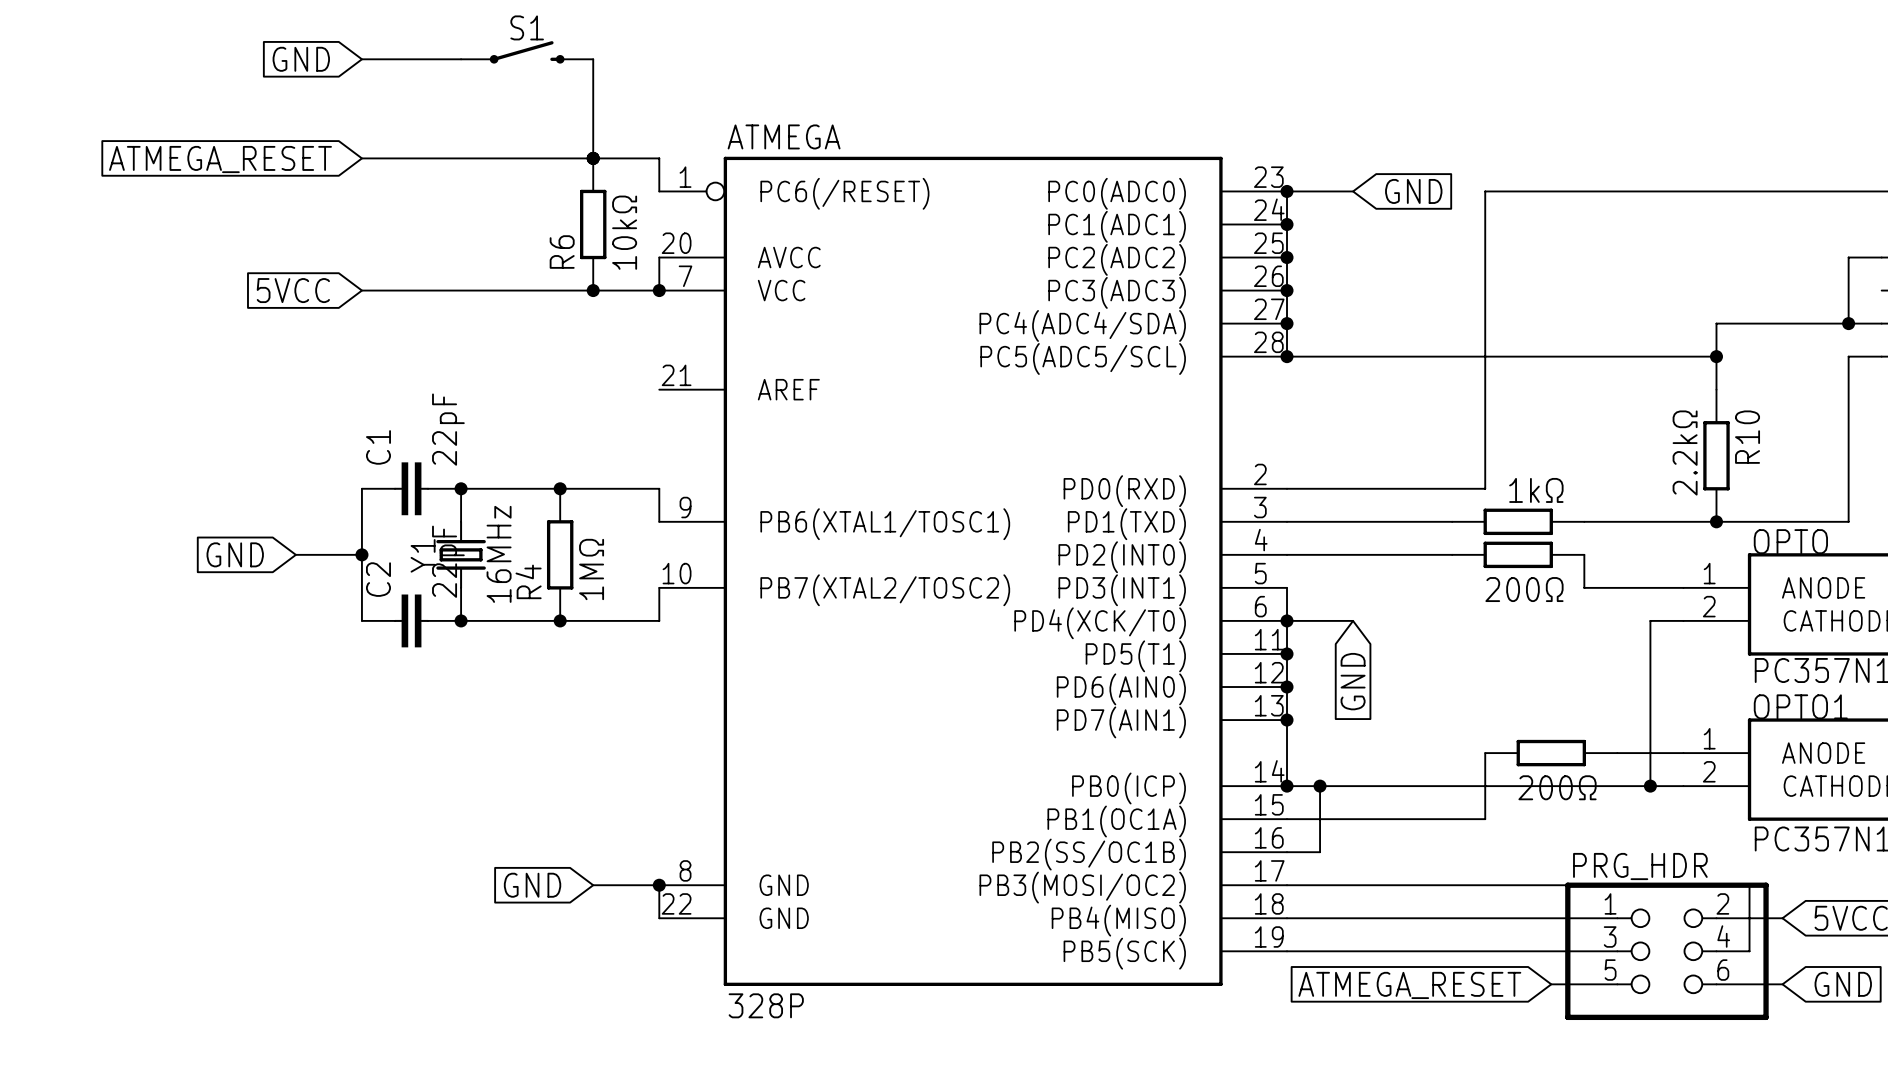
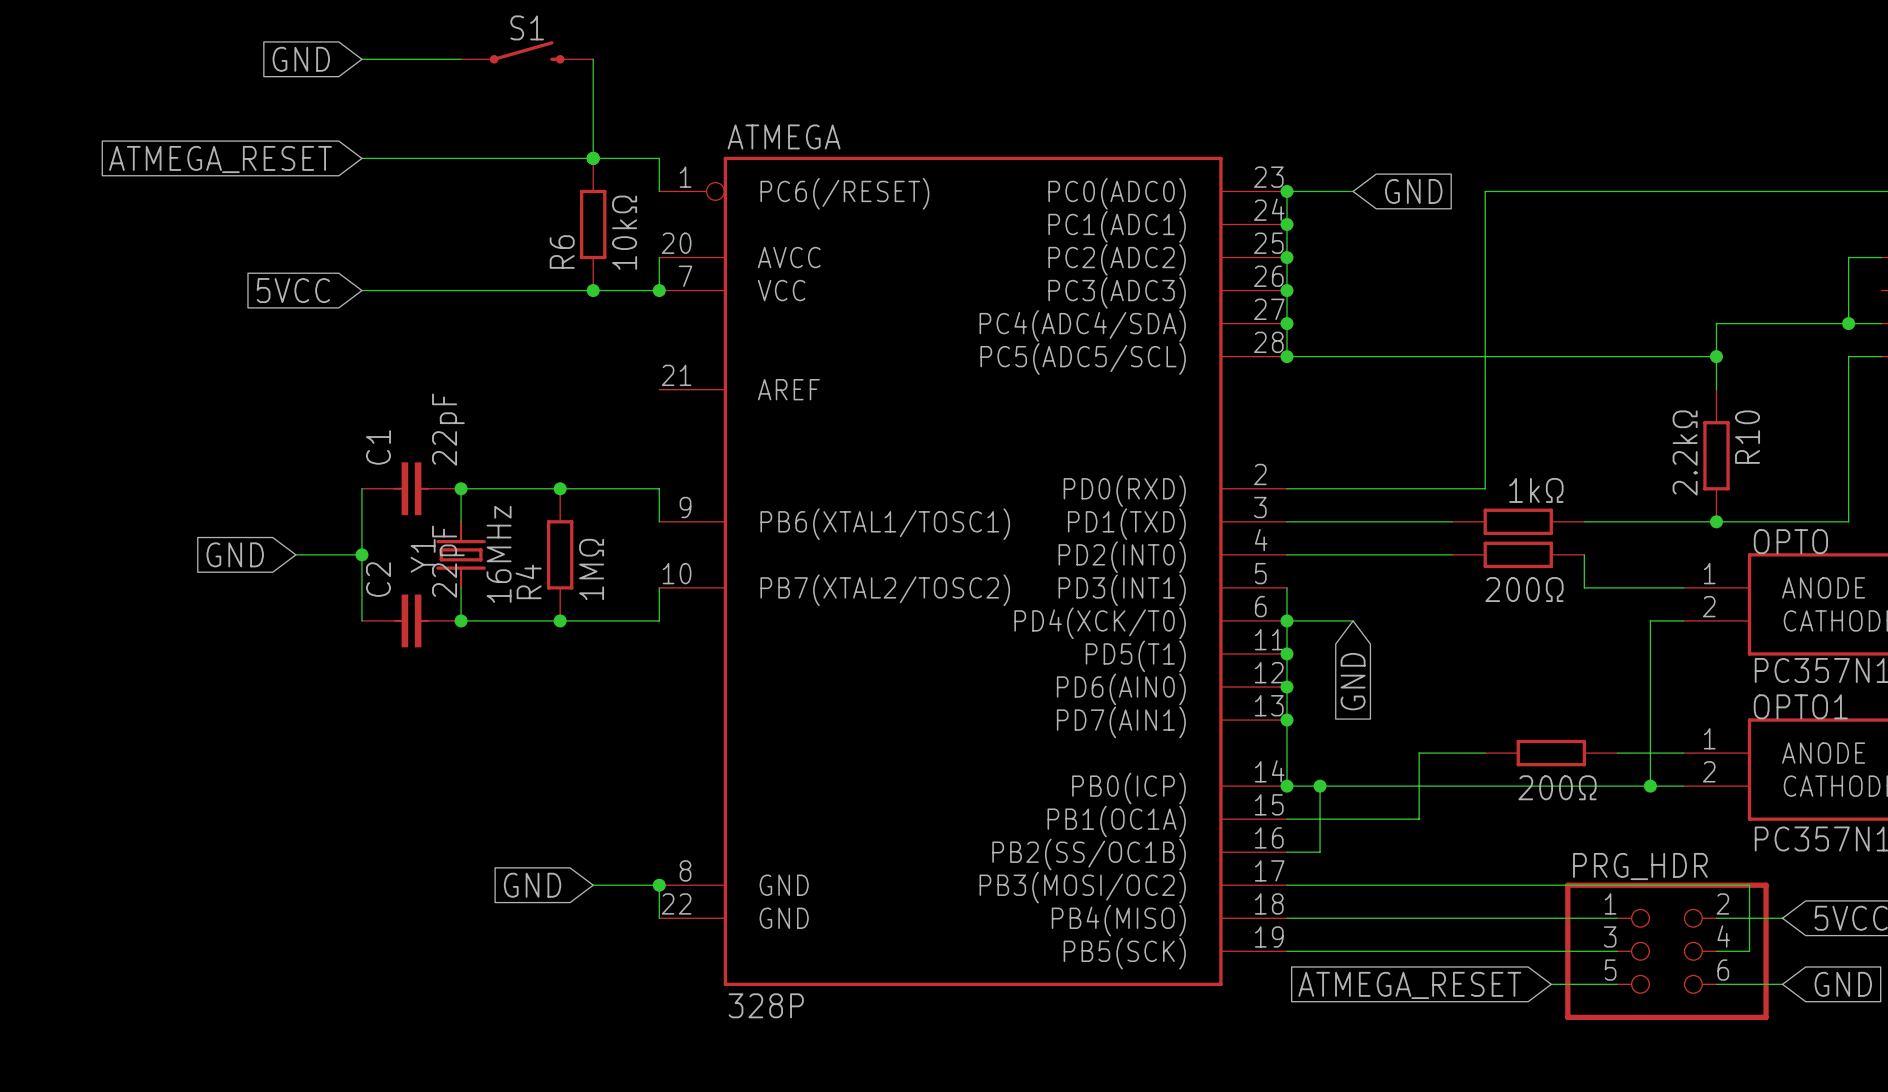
wire: (1485, 753) (1485, 819) (1419, 819) -> (1485, 753) (1419, 753) (1419, 819)

